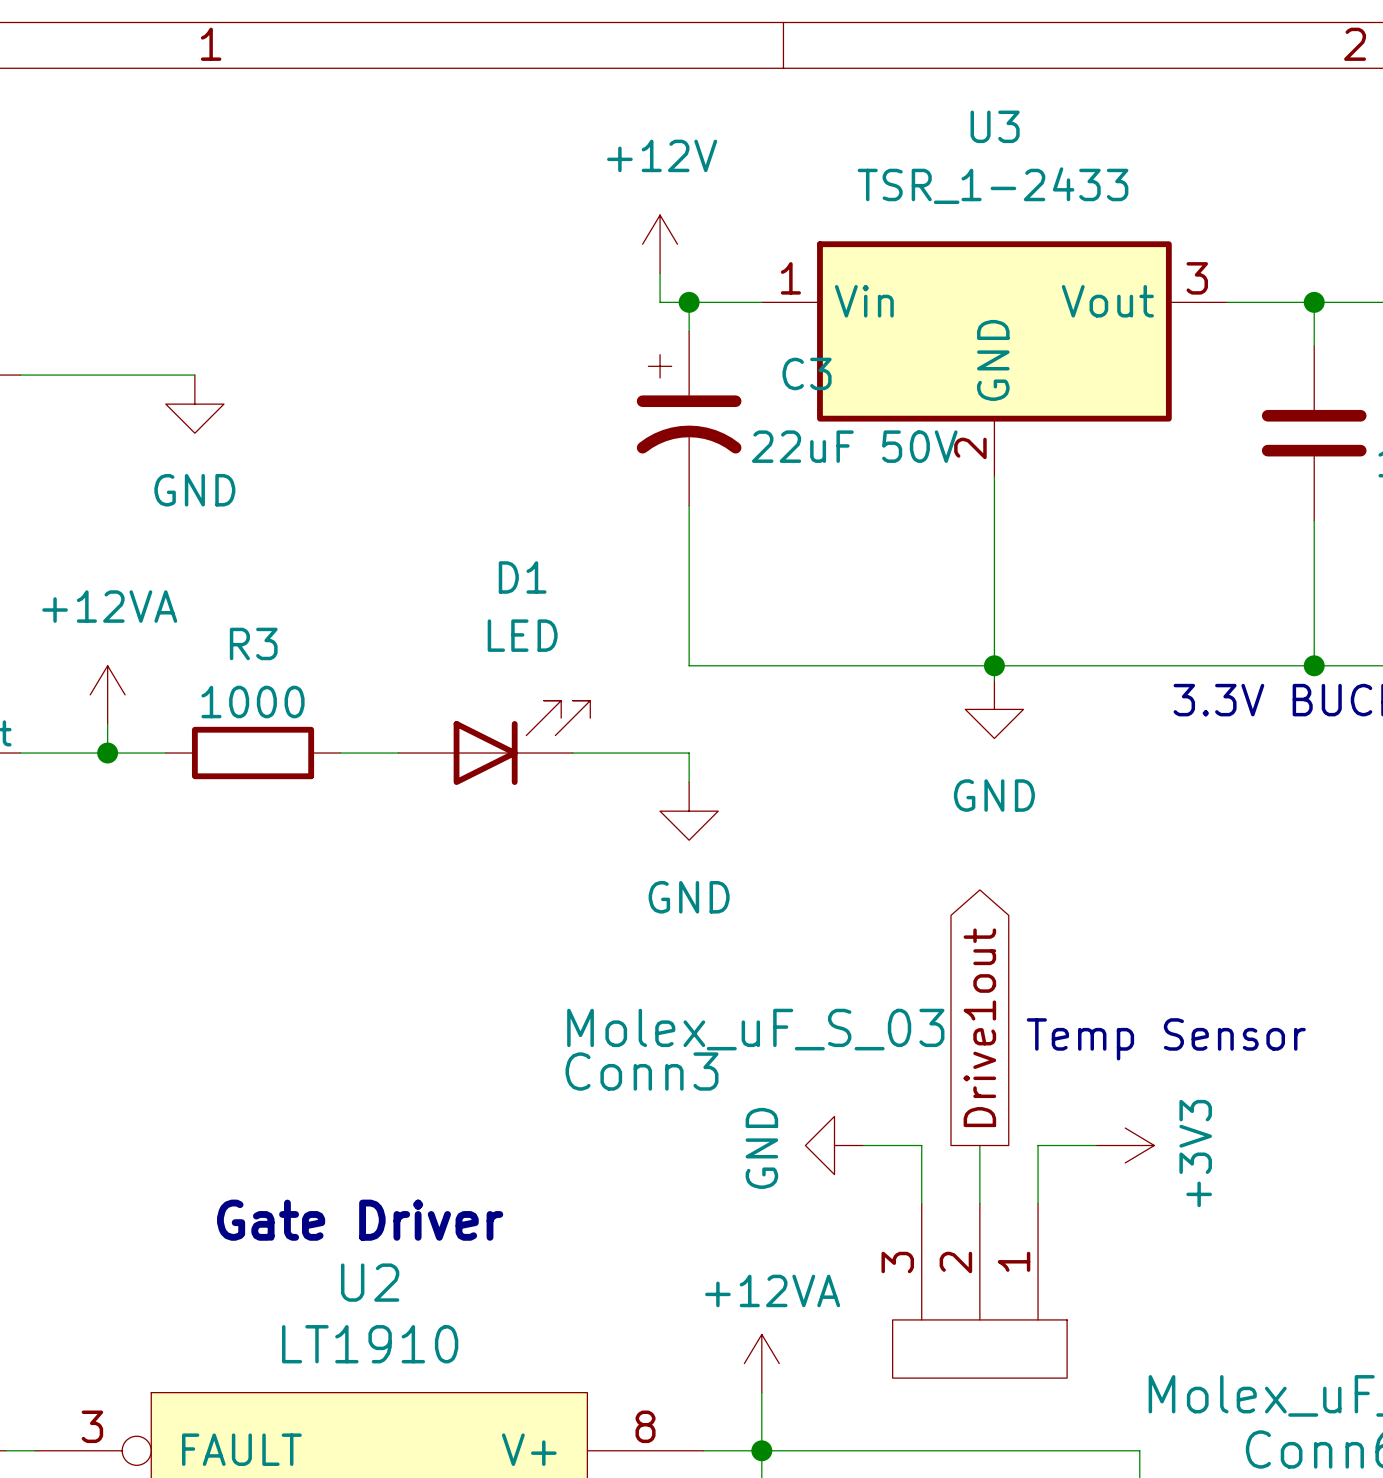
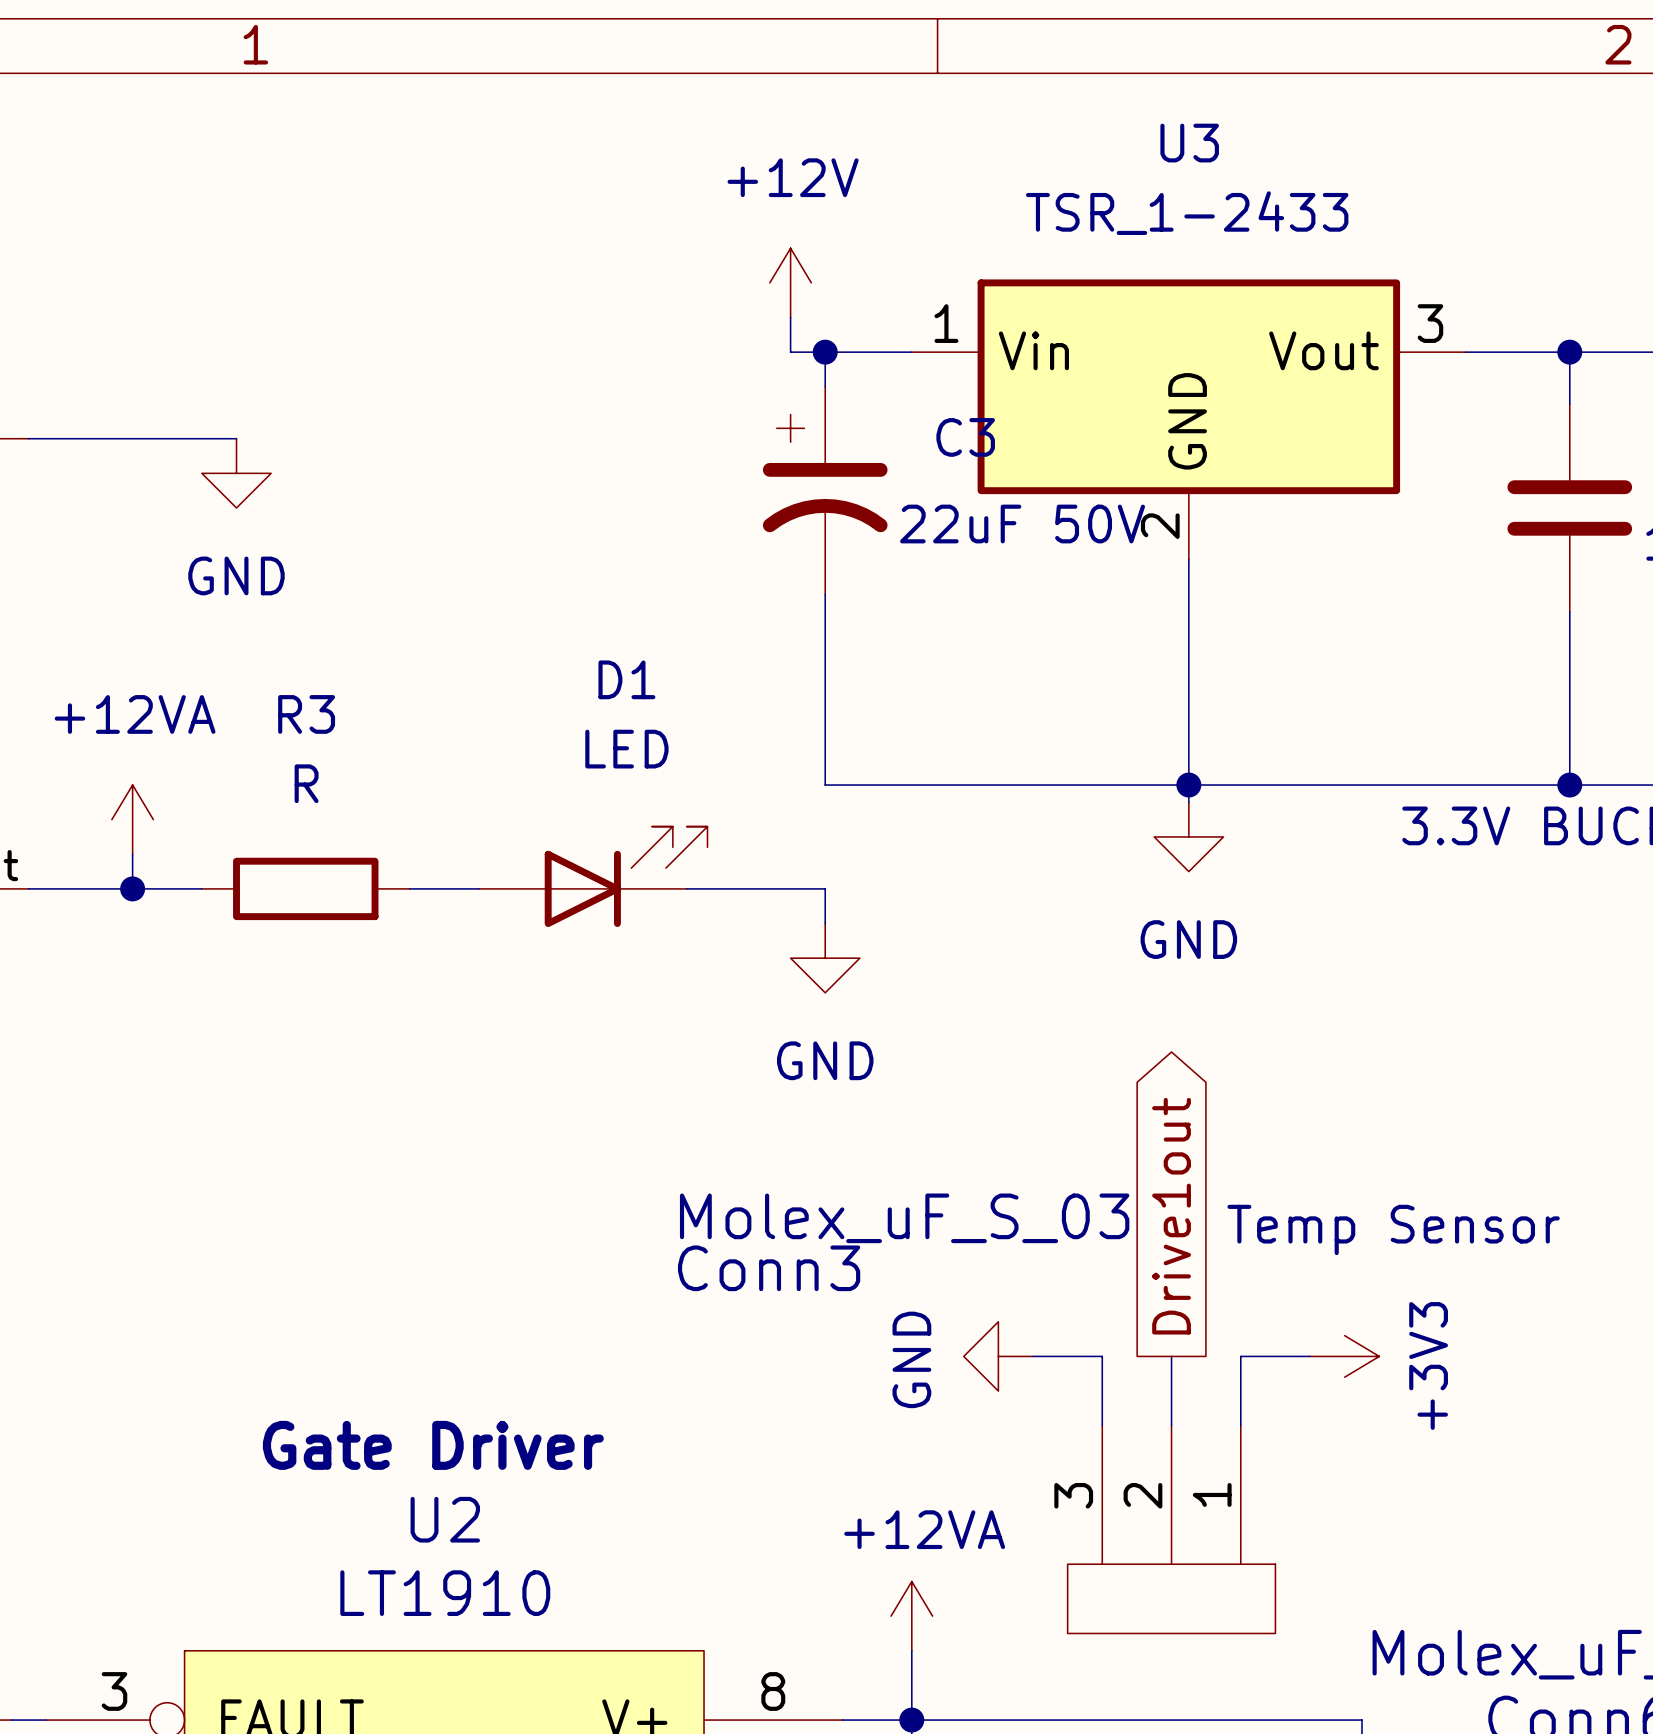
R3 name position: R3 (253, 643) -> R3 (306, 714)
R3 value: 1000 (253, 702) -> R (306, 783)

